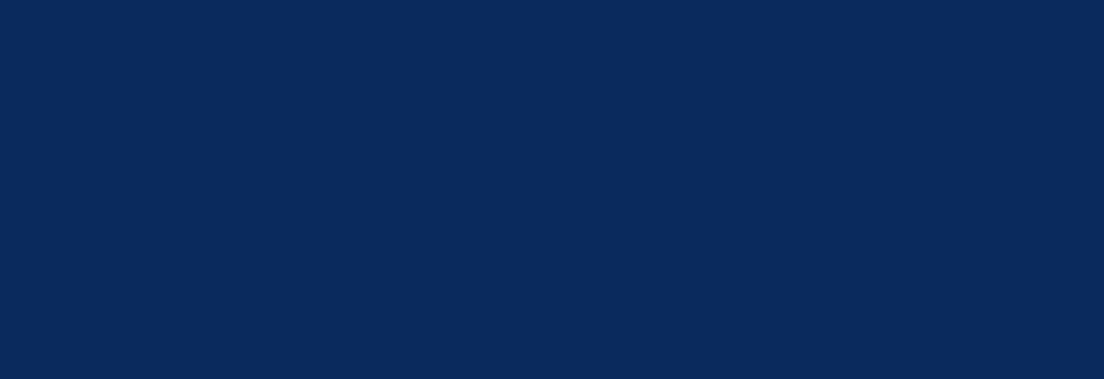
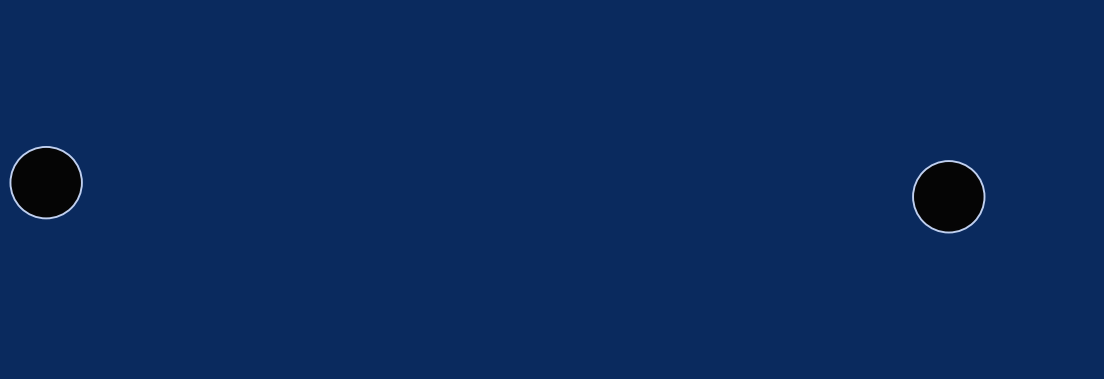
part: none -> (46, 182)
part: none -> (948, 196)

